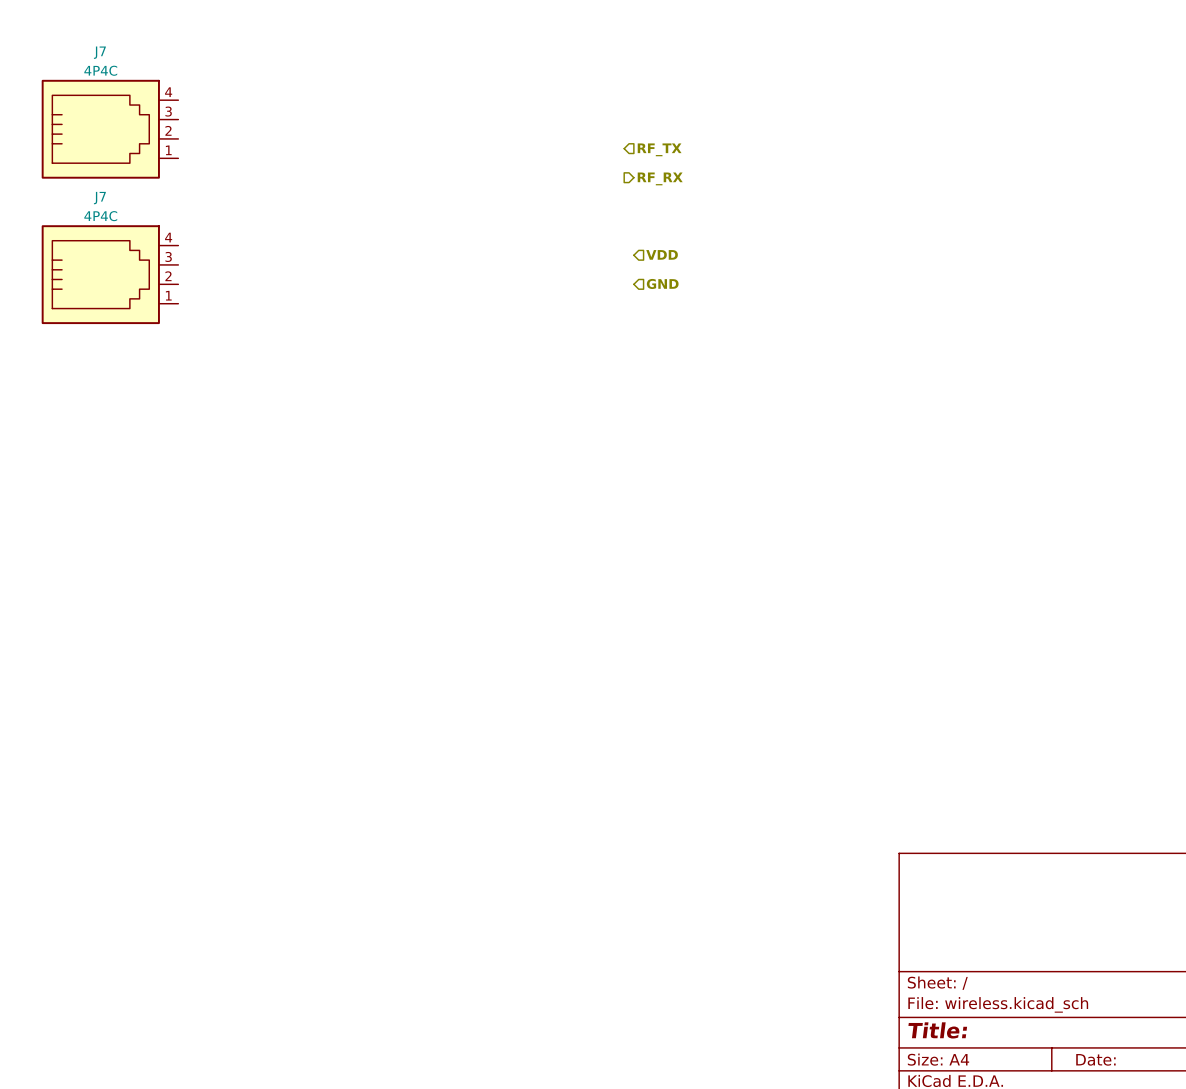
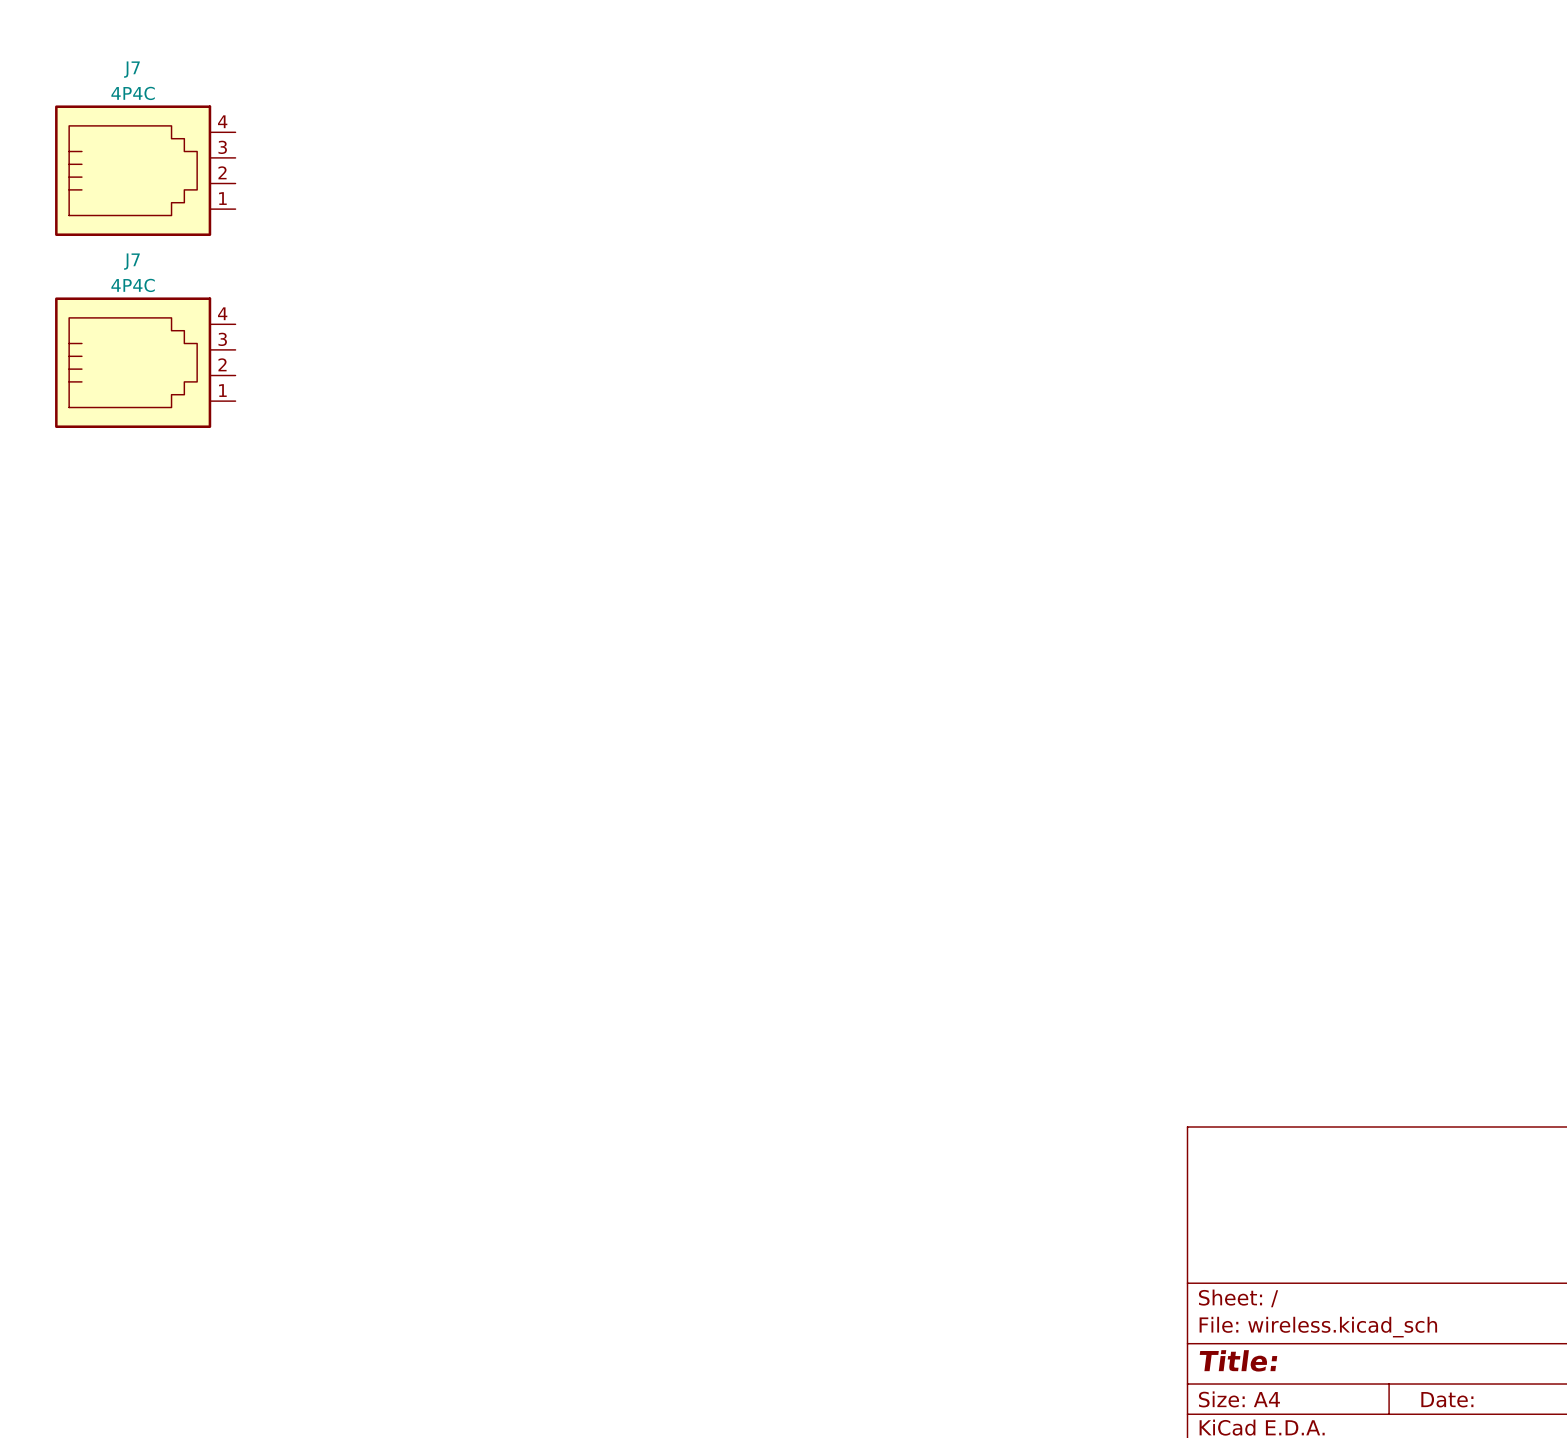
hierarchical label: RF_TX (659, 149) -> none
hierarchical label: RF_RX (660, 178) -> none
hierarchical label: VDD (662, 254) -> none
hierarchical label: GND (662, 283) -> none

